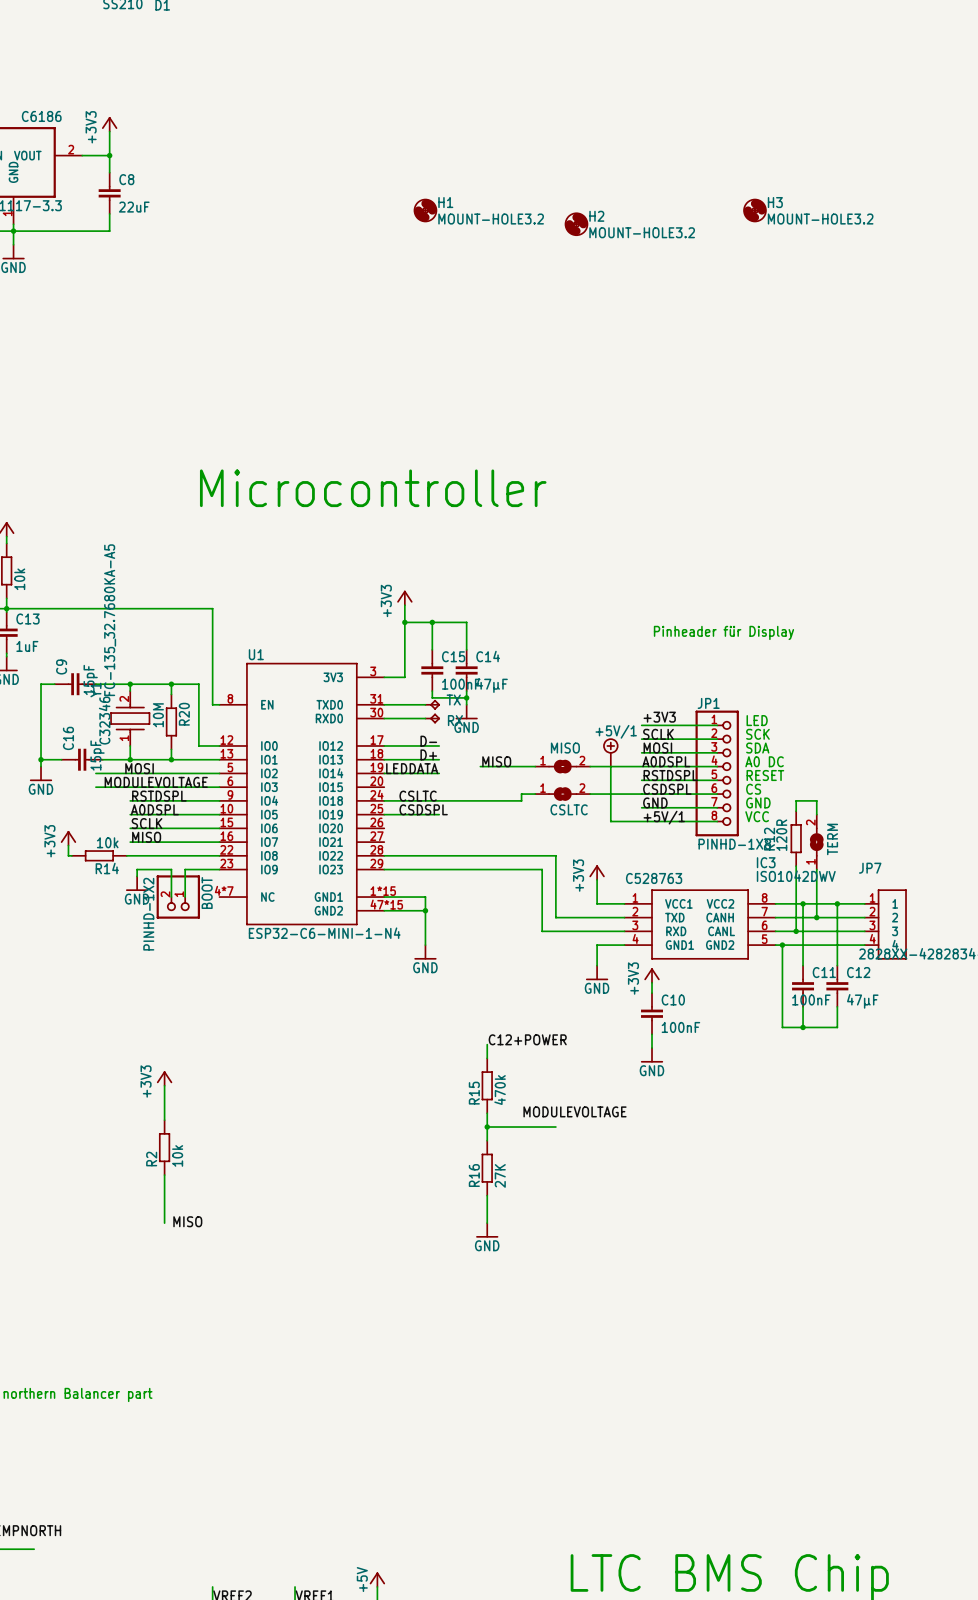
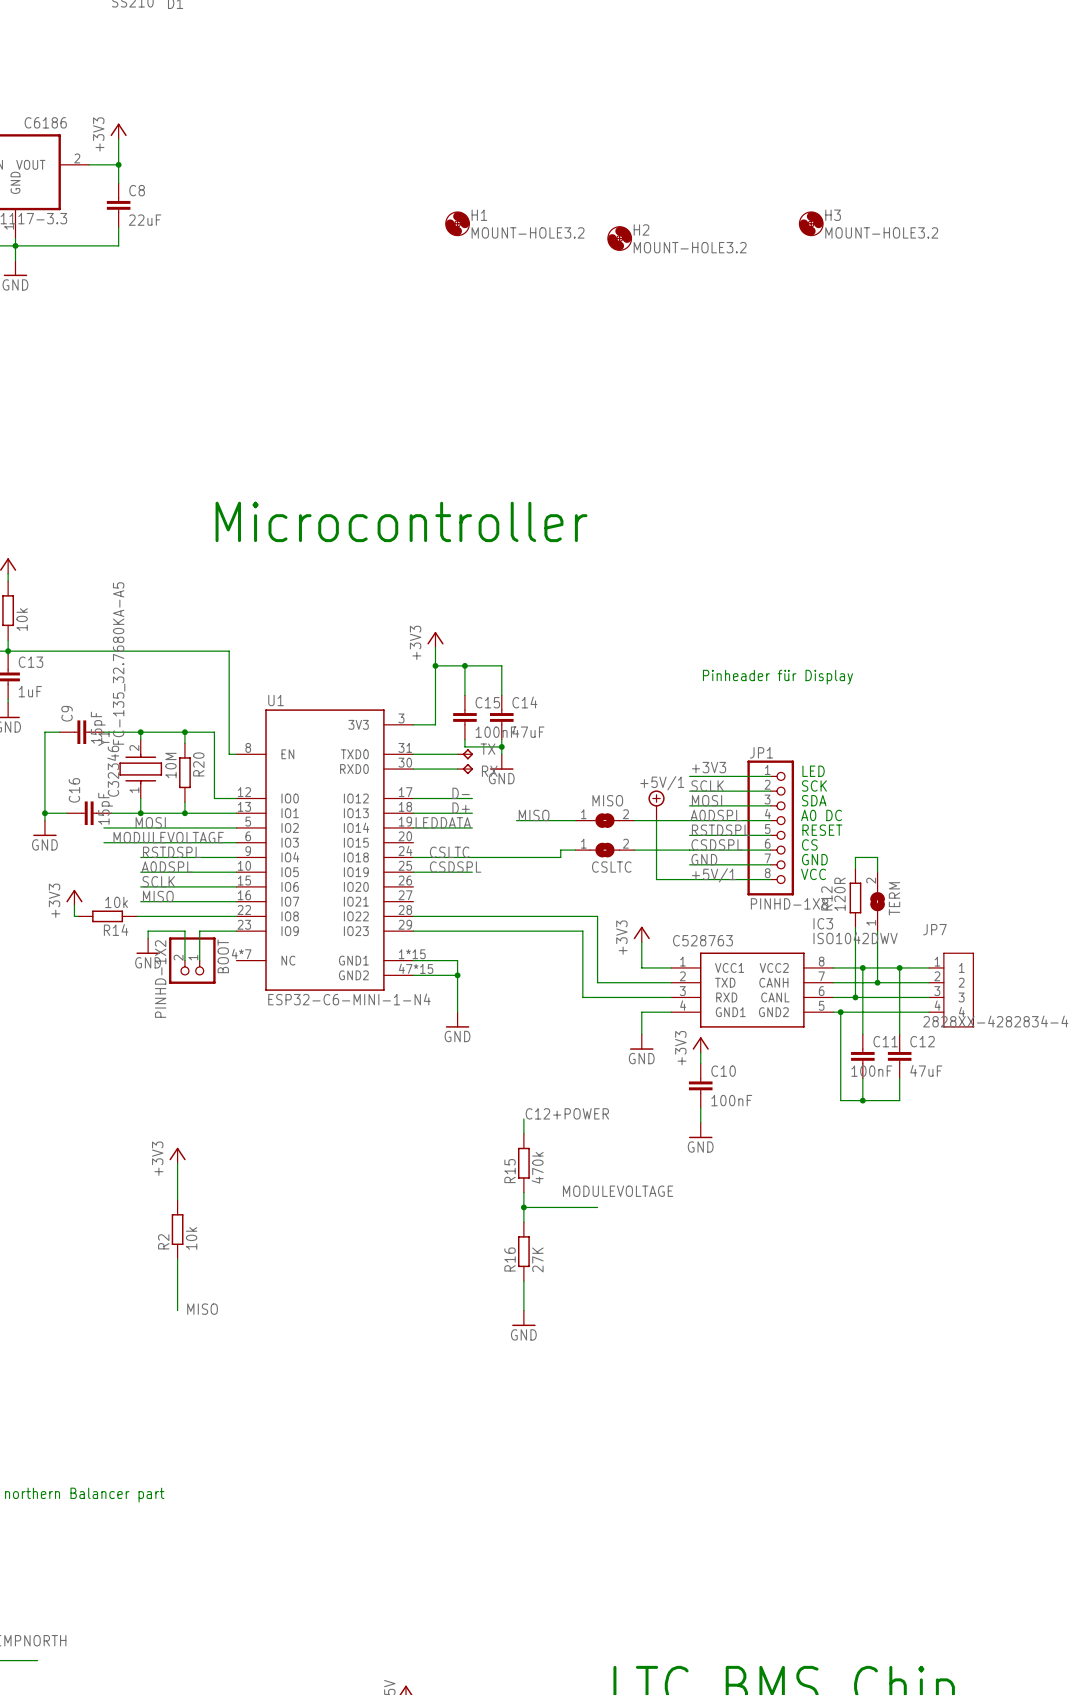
C14 value: 47µF (492, 685) -> 47uF (528, 731)
C12 value: 47µF (862, 1001) -> 47uF (926, 1070)

